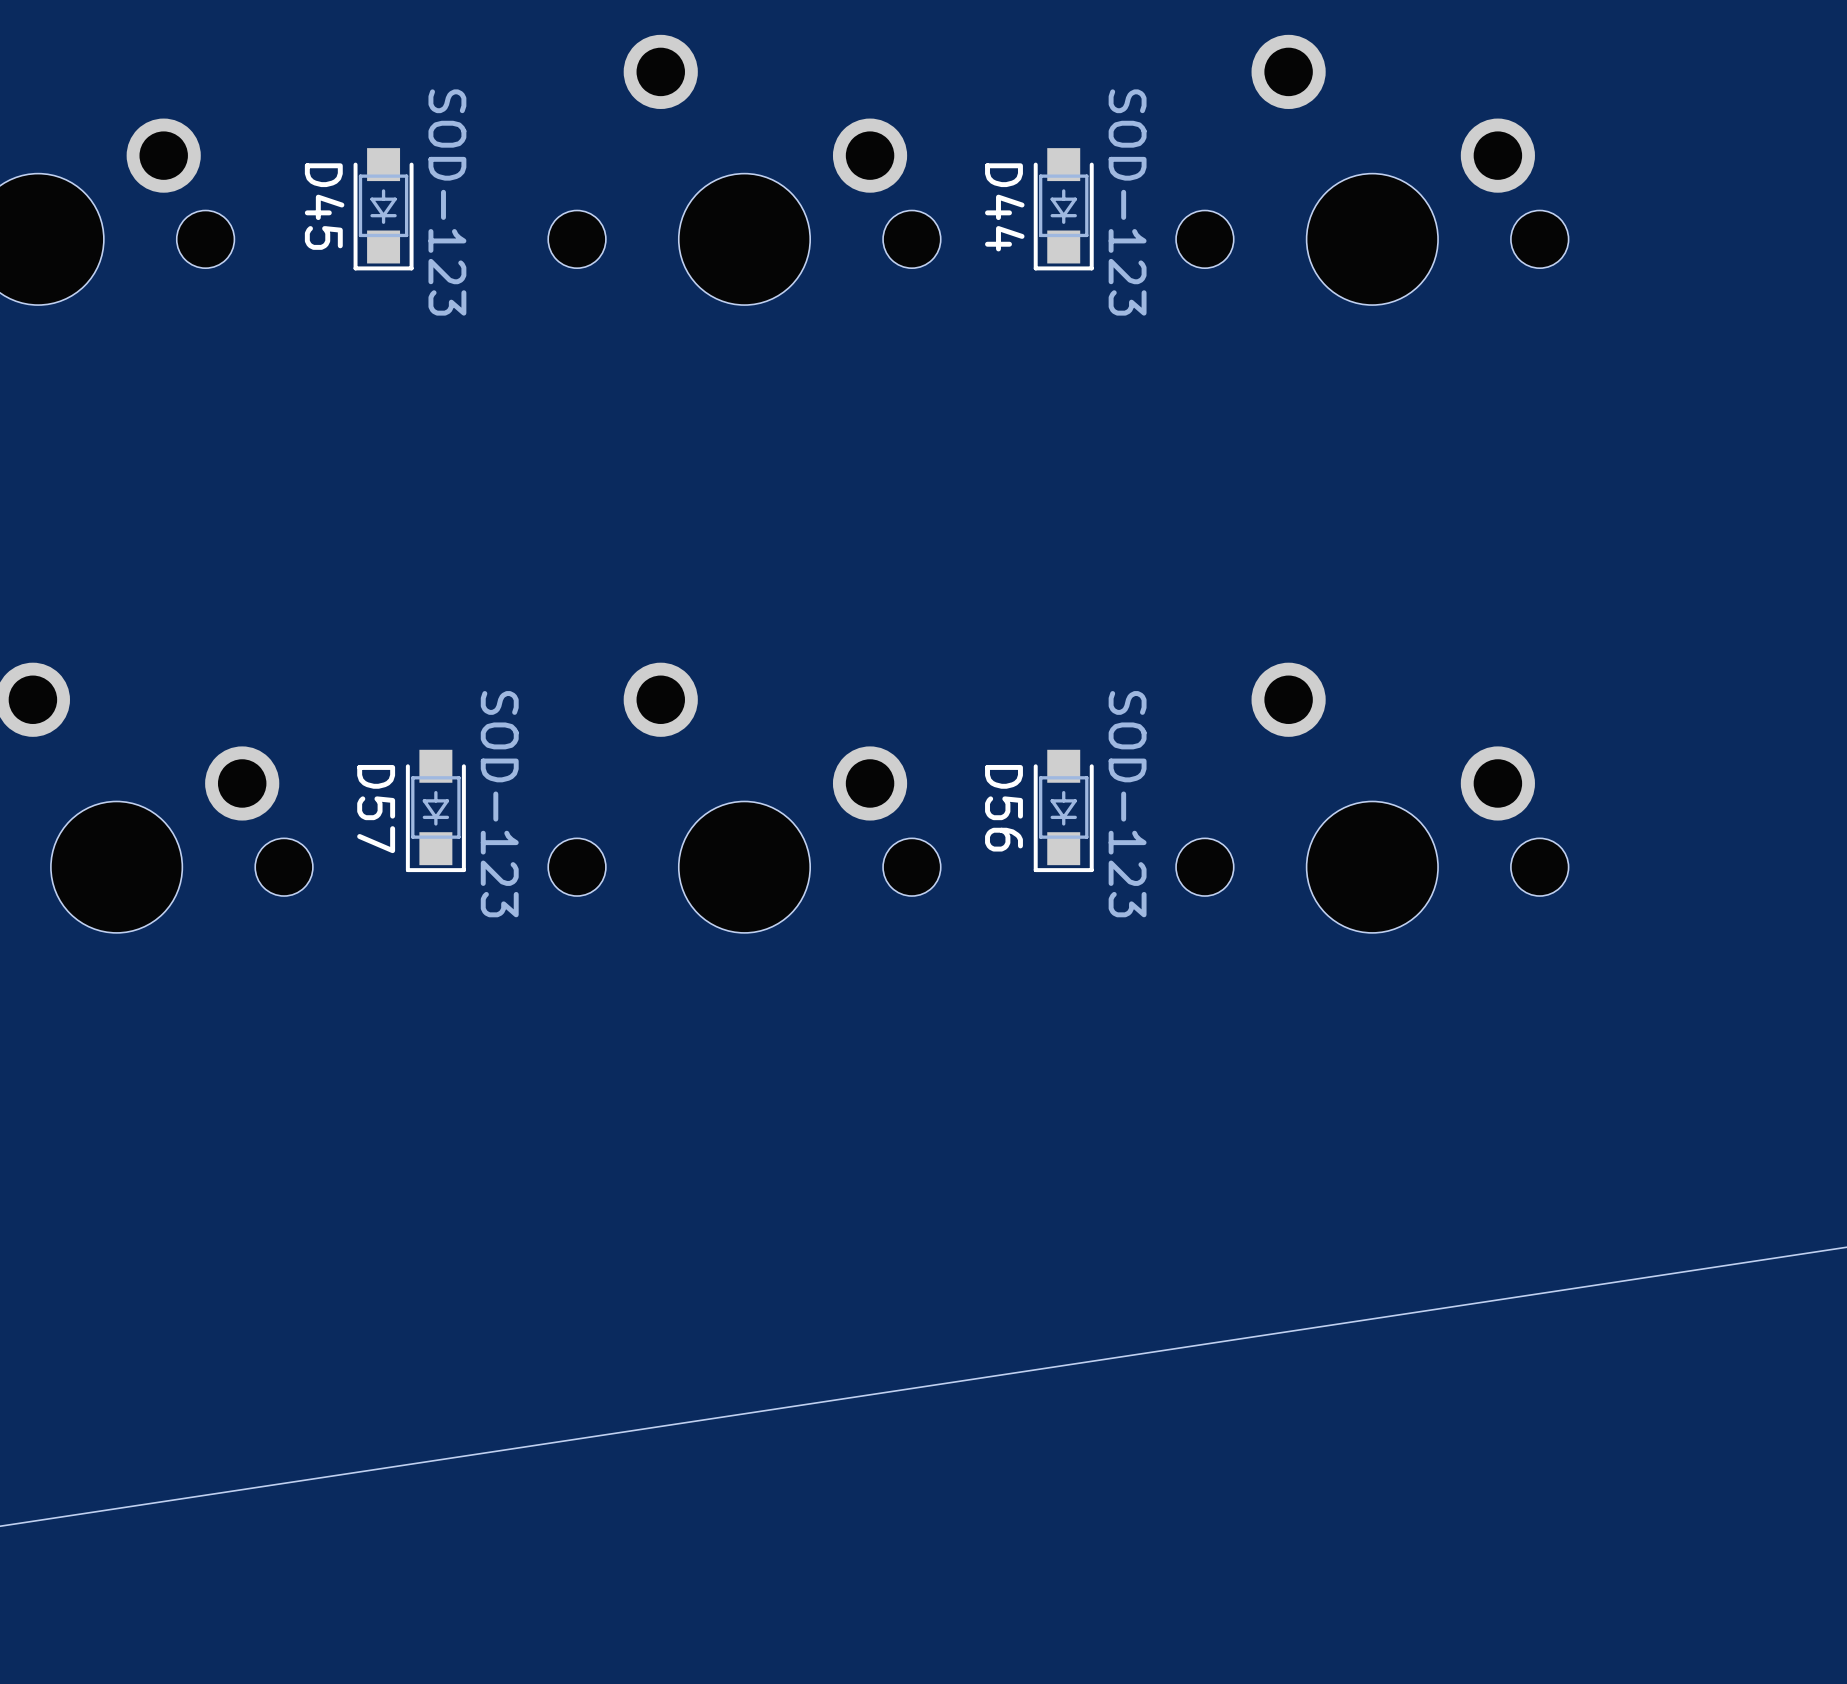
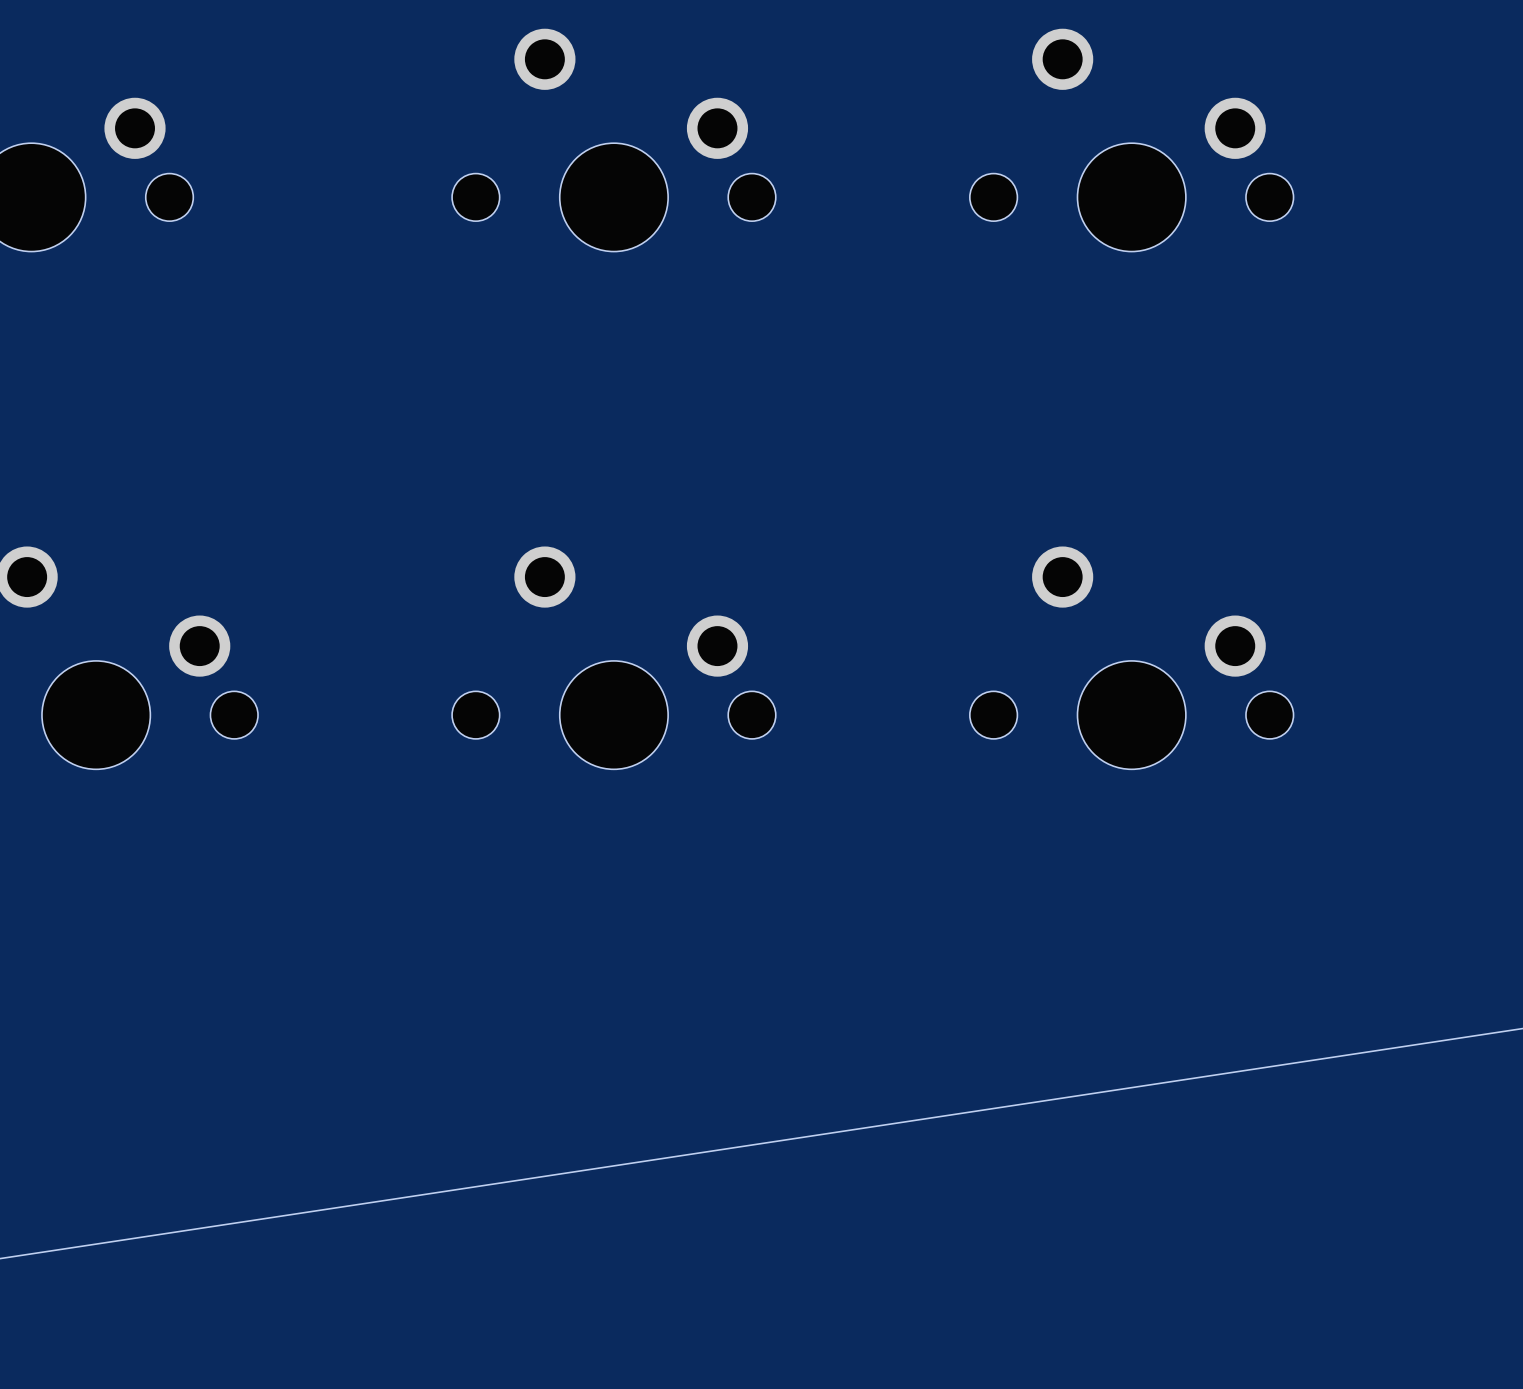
D45: SOD-123 (383, 209) -> none
D44: SOD-123 (1063, 209) -> none
D57: SOD-123 (435, 810) -> none
D56: SOD-123 (1063, 810) -> none

